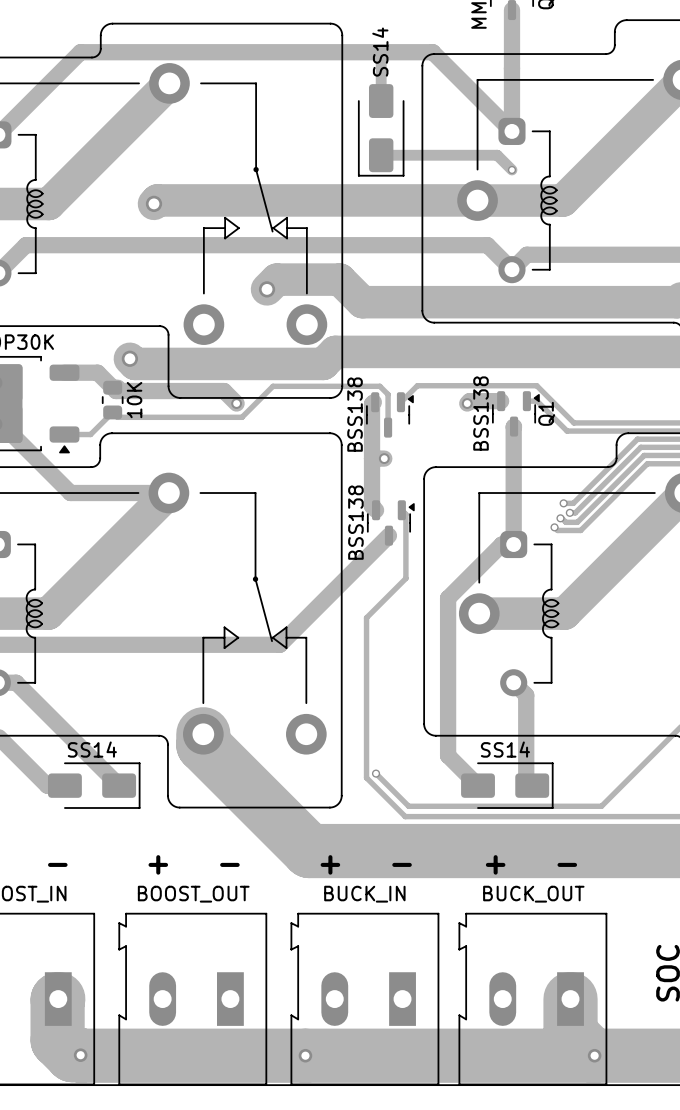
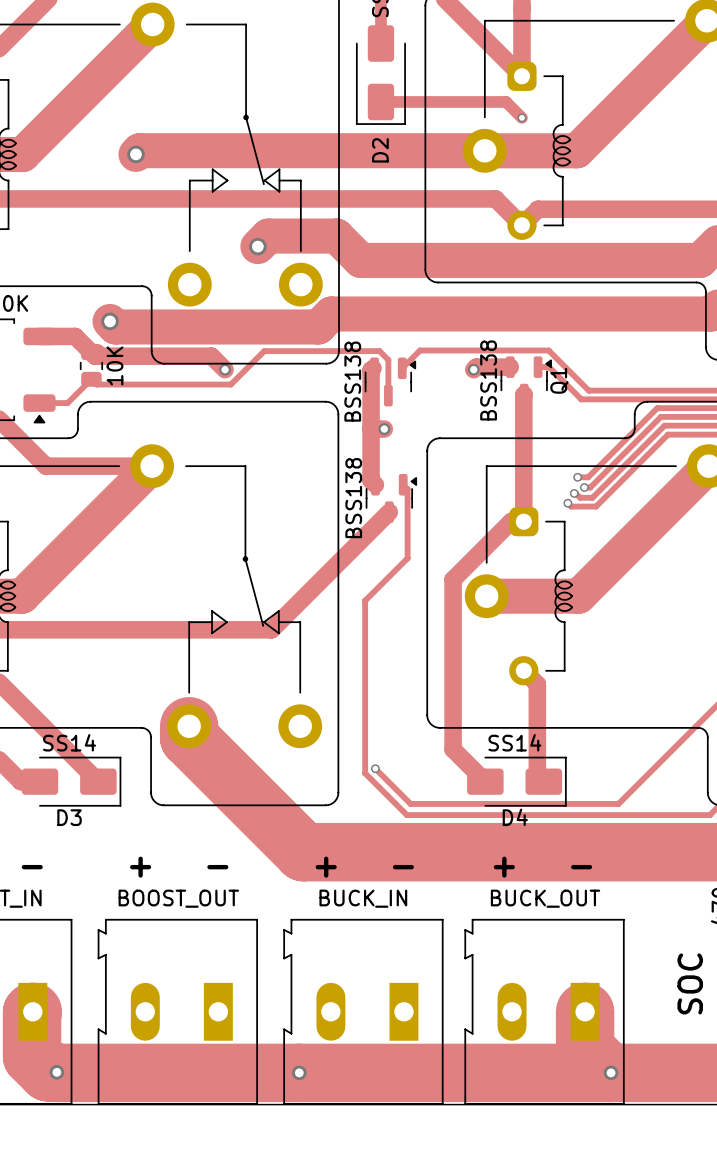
D2 name: none -> D2 (380, 150)
D4 name: none -> D4 (515, 817)
D3 name: none -> D3 (69, 817)

